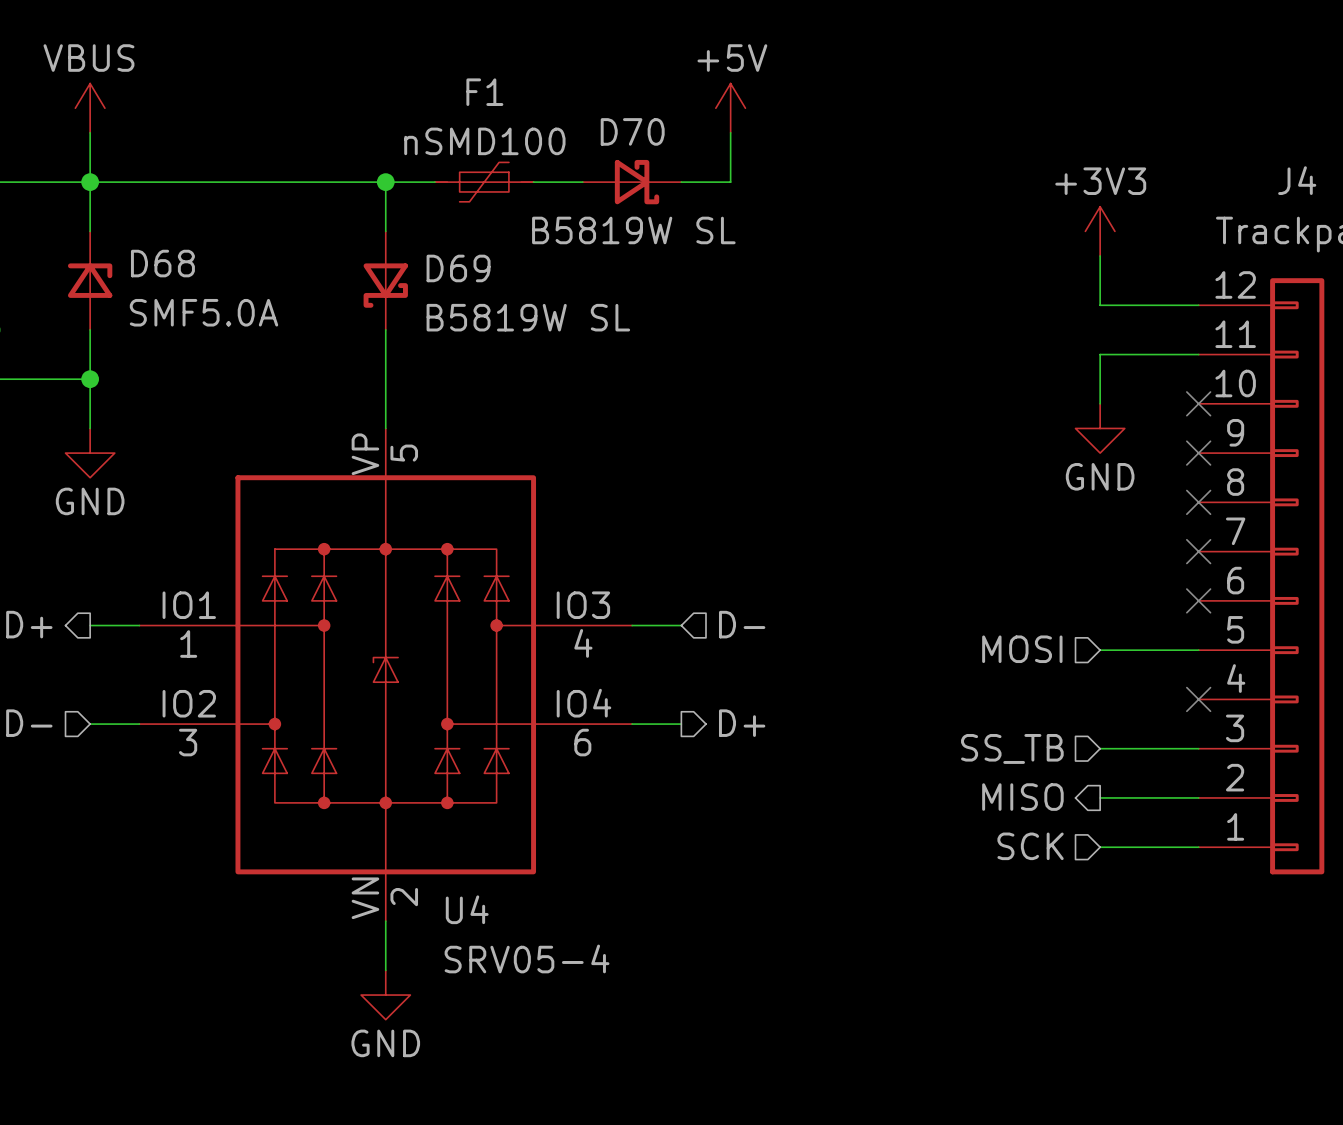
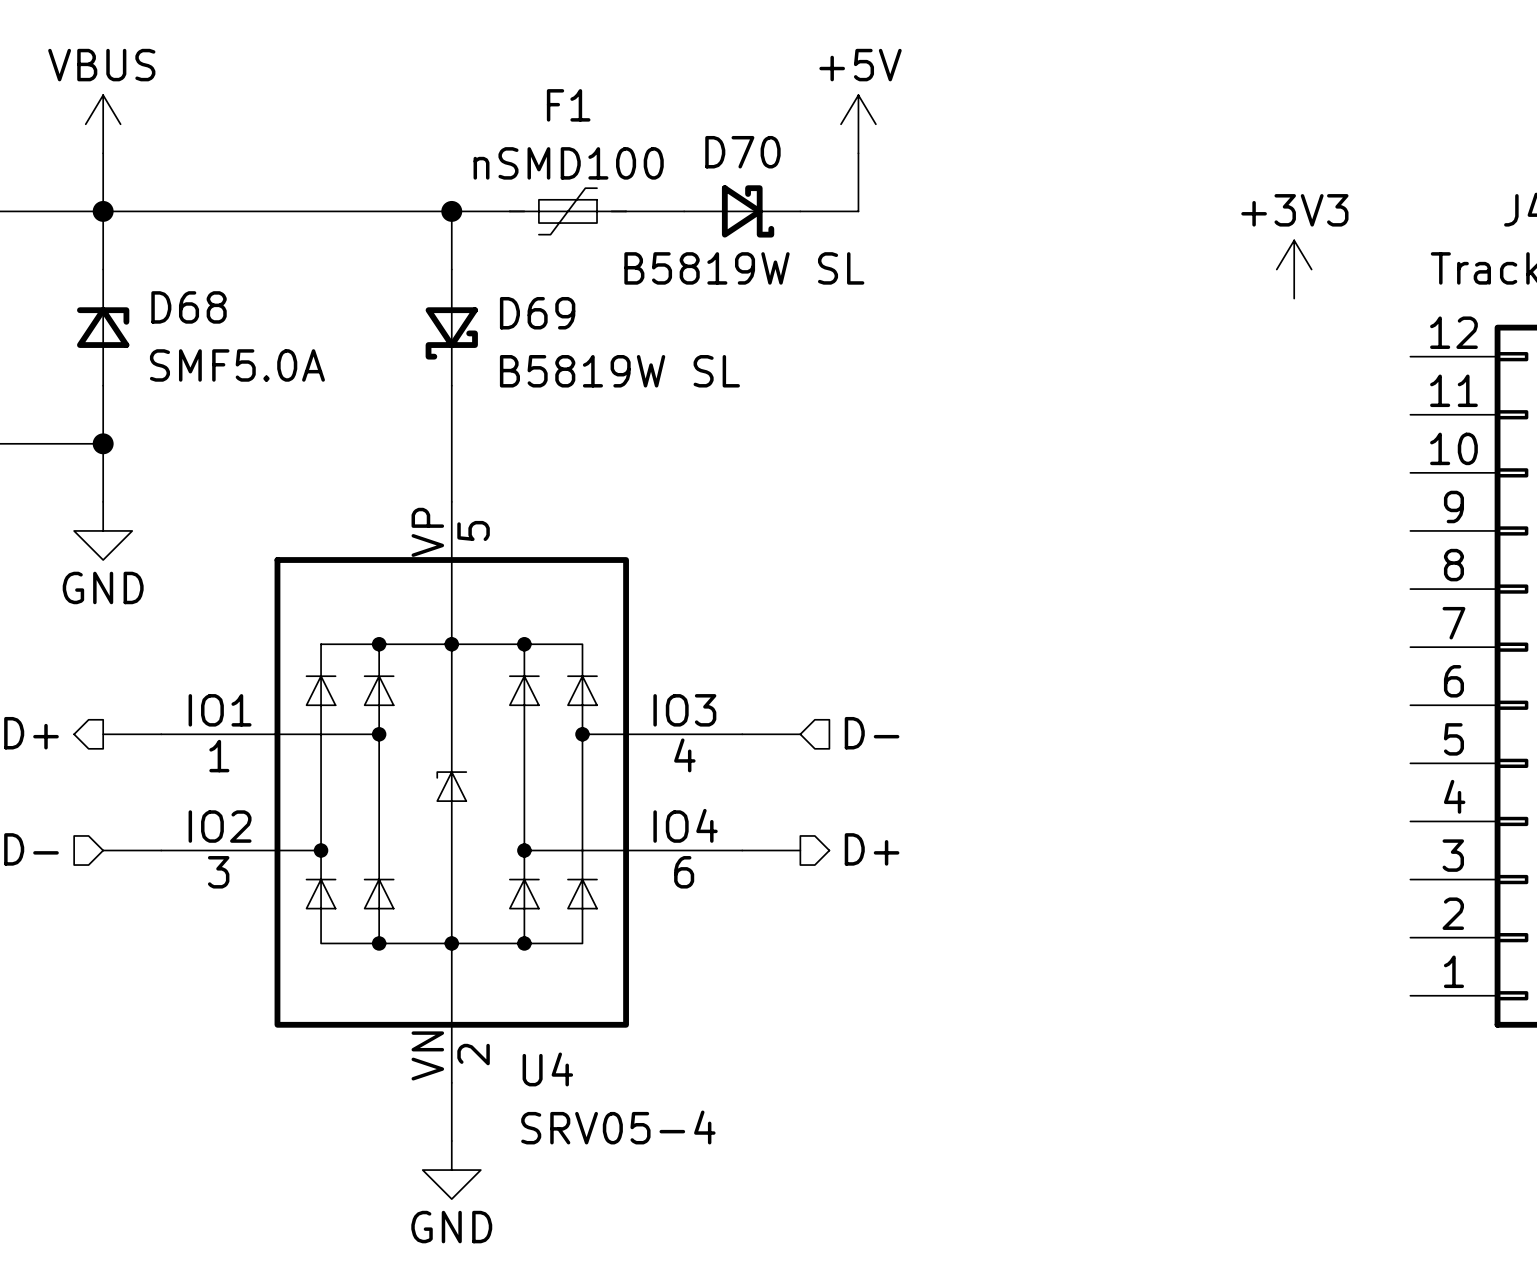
wire: (1100, 256) (1100, 305) (1198, 305) -> none
wire: (1198, 354) (1100, 354) (1100, 403) -> none
no-connect mark: (1198, 403) -> none
power symbol: GND (1100, 428) -> none
no-connect mark: (1198, 453) -> none
no-connect mark: (1198, 502) -> none
no-connect mark: (1198, 551) -> none
no-connect mark: (1198, 600) -> none
hierarchical label: MOSI (1022, 649) -> none
wire: (1100, 650) (1198, 650) -> none
no-connect mark: (1198, 699) -> none
hierarchical label: SS_TB (1012, 748) -> none
wire: (1100, 748) (1198, 748) -> none
hierarchical label: MISO (1022, 797) -> none
wire: (1100, 797) (1198, 797) -> none
hierarchical label: SCK (1030, 846) -> none
wire: (1100, 847) (1198, 847) -> none

